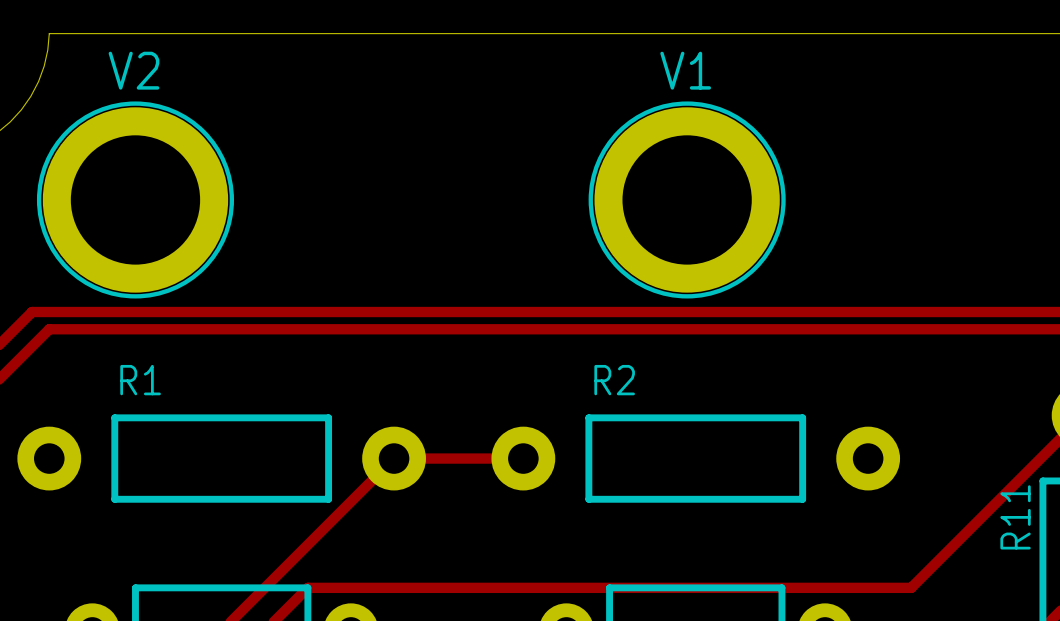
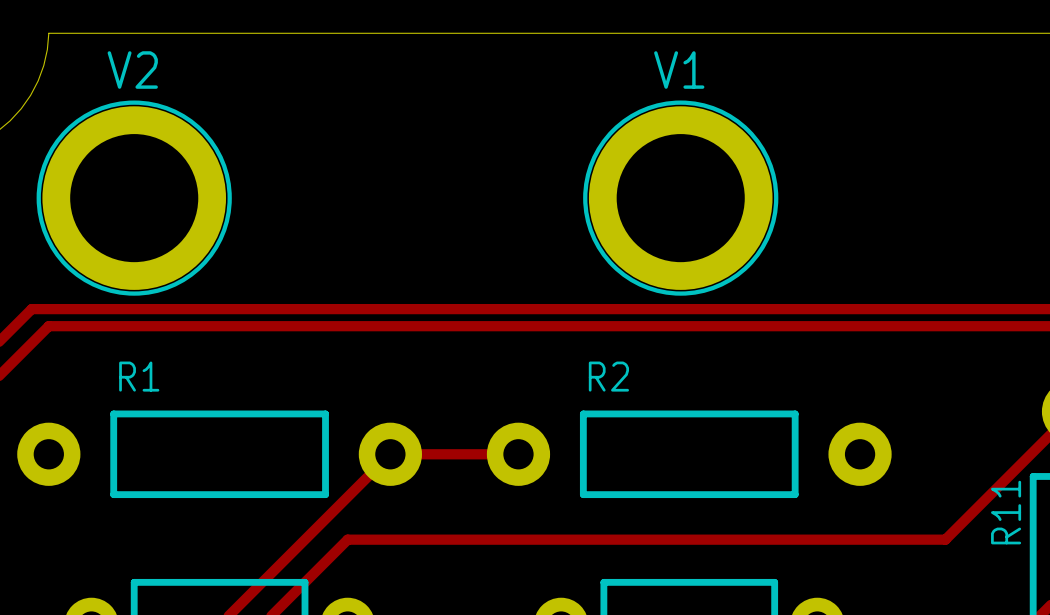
track: (954, 544) (911, 587) (307, 587) -> (945, 539) (347, 539) (305, 582)

